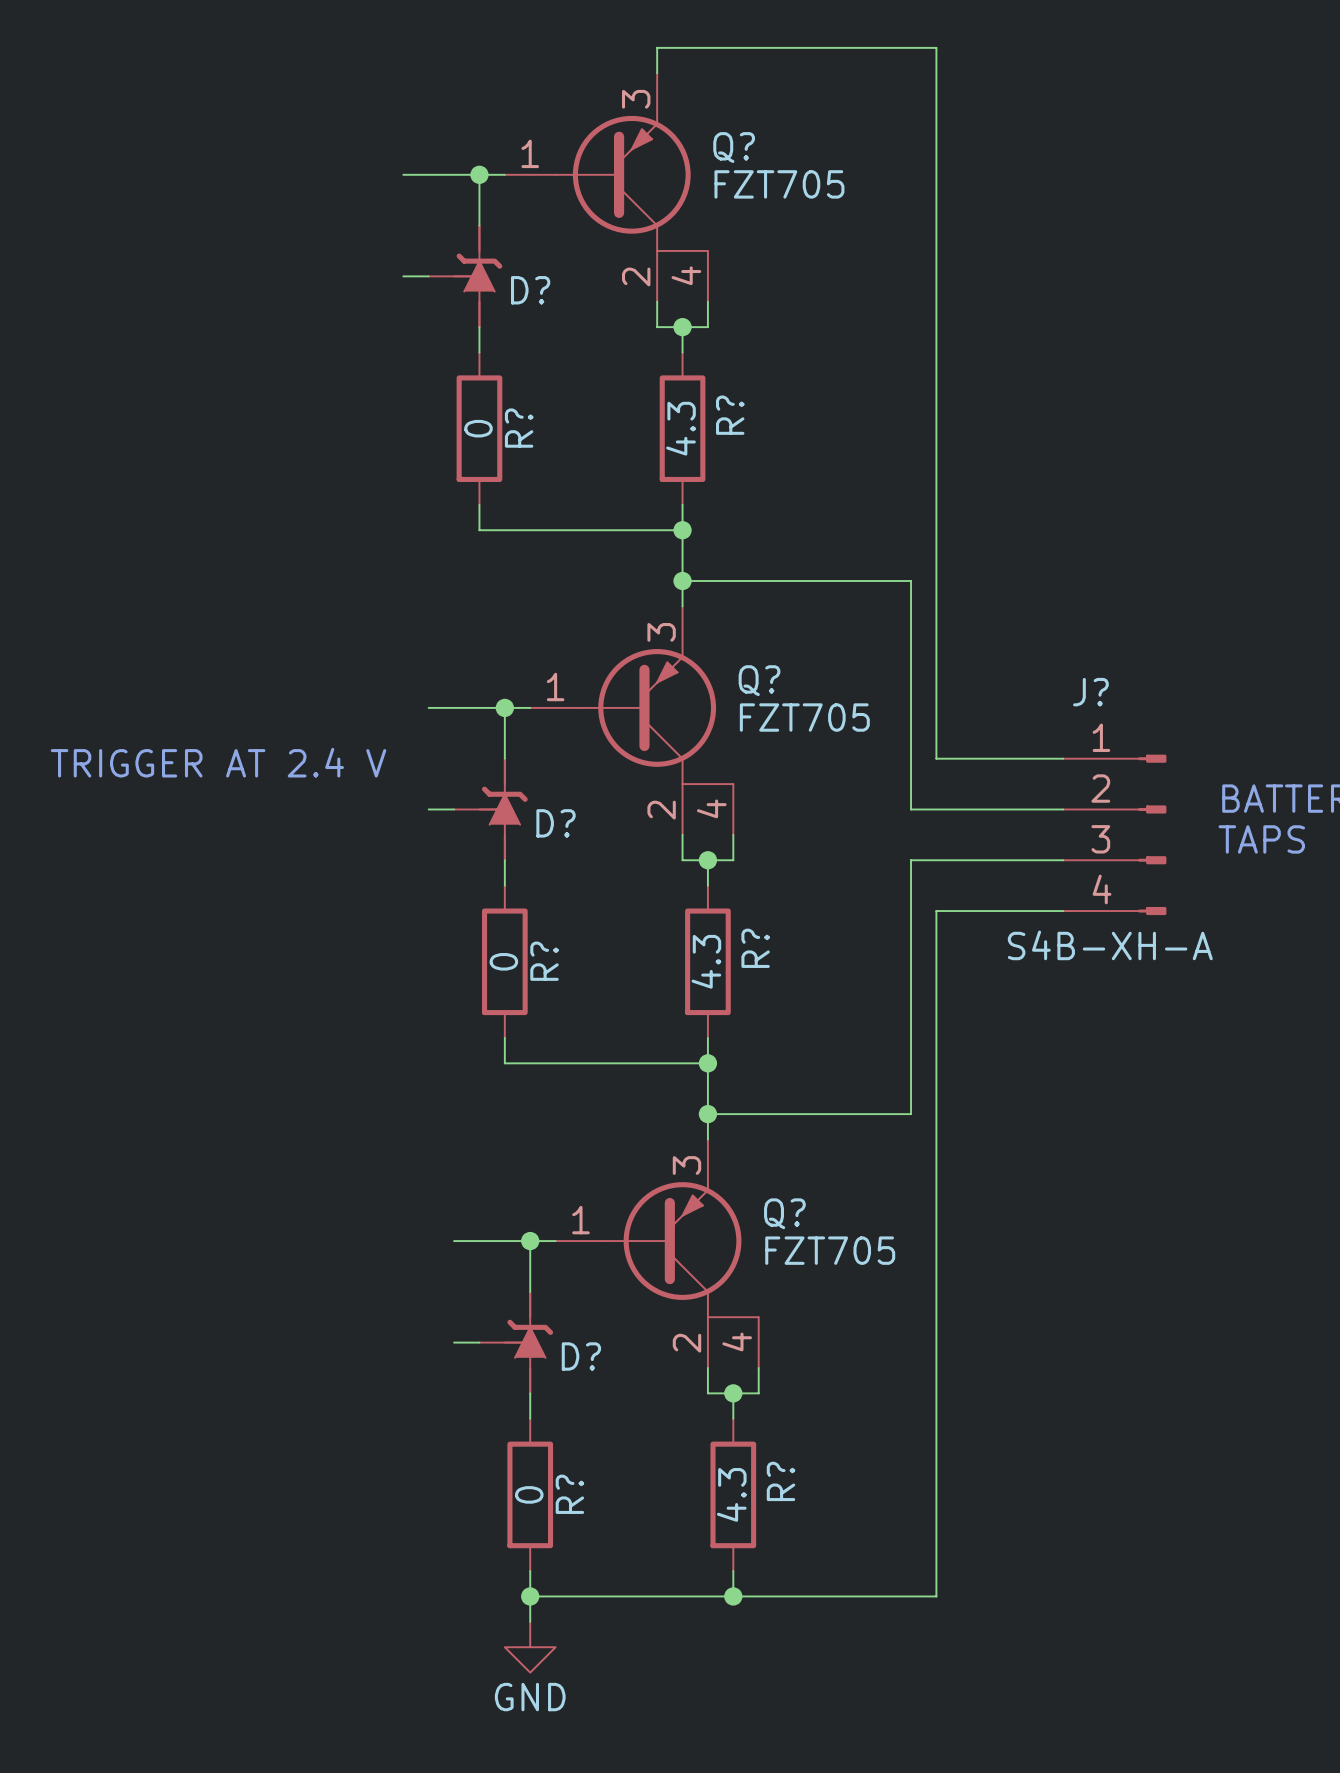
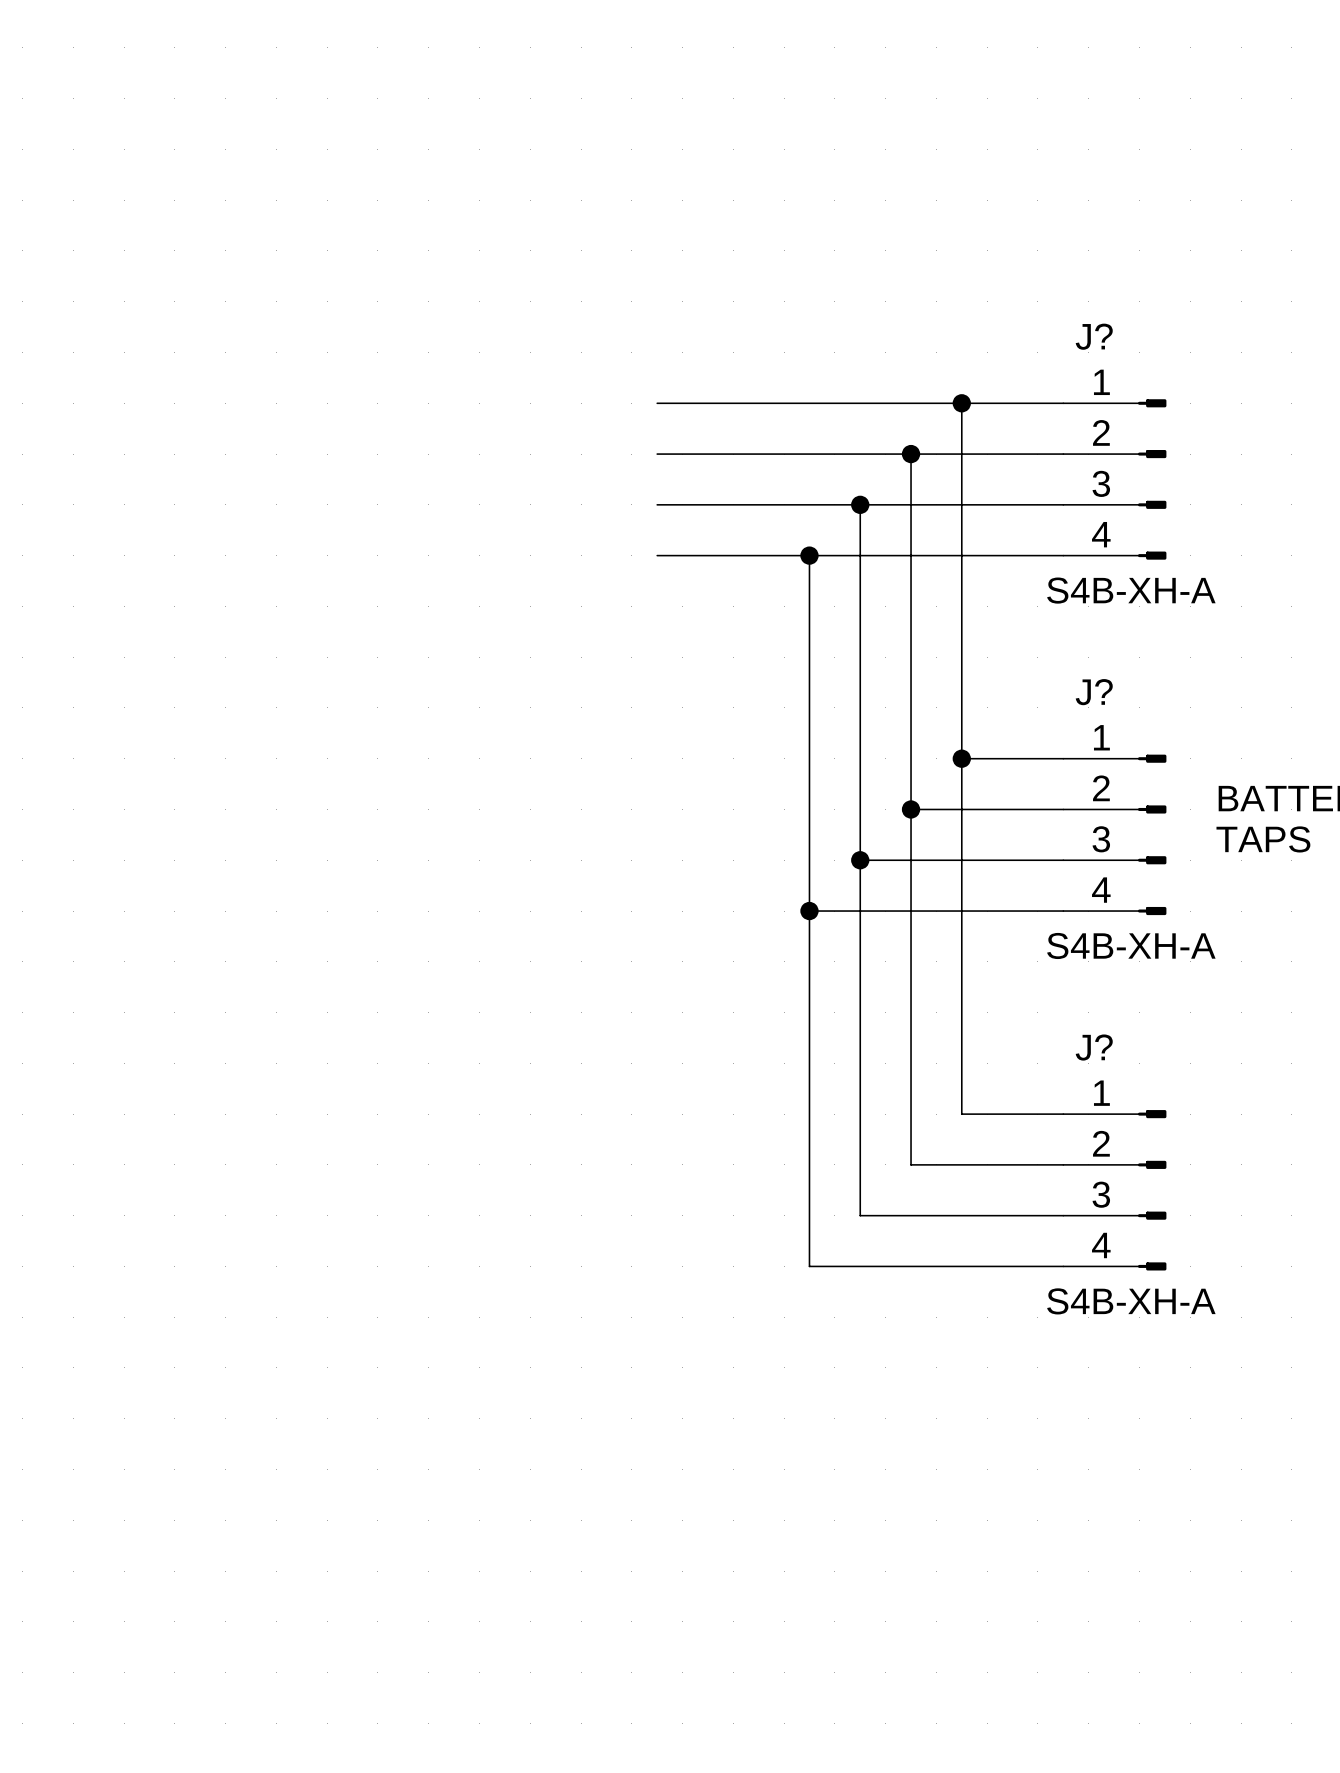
wire: (657, 73) (657, 47) (936, 47) (936, 758) (961, 758) -> none
wire: (403, 174) (504, 174) -> none
wire: (479, 174) (479, 225) -> none
junction: (479, 174) -> none
Q?: FZT705 (606, 187) -> none
wire: (403, 276) (428, 276) -> none
D?: (465, 276) -> none
wire: (657, 301) (657, 327) (707, 327) (707, 301) -> none
wire: (479, 327) (479, 352) -> none
wire: (682, 327) (682, 352) -> none
junction: (682, 327) -> none
wire: none -> (657, 403) (1063, 403)
wire: none -> (961, 403) (961, 1114) (1063, 1114)
junction: none -> (961, 403)
R?: (479, 428) -> none
R?: (682, 428) -> none
wire: none -> (657, 454) (1063, 454)
junction: none -> (911, 454)
J?: none -> S4B-XH-A (1114, 479)
wire: (479, 504) (479, 530) (682, 530) -> none
wire: none -> (657, 504) (1063, 504)
wire: (682, 504) (682, 606) -> none
wire: none -> (860, 504) (860, 1215) (1063, 1215)
junction: none -> (860, 504)
junction: (682, 530) -> none
wire: none -> (657, 555) (1063, 555)
wire: none -> (809, 555) (809, 1266) (1063, 1266)
junction: none -> (809, 555)
wire: (682, 581) (911, 581) -> (911, 454) (911, 581)
junction: (682, 581) -> none
wire: (428, 707) (530, 707) -> none
wire: (504, 707) (504, 758) -> none
junction: (504, 707) -> none
Q?: FZT705 (631, 720) -> none
junction: none -> (961, 758)
text: TRIGGER AT 2.4 V (218, 762) -> none
wire: (428, 809) (454, 809) -> none
D?: (490, 809) -> none
wire: none -> (911, 809) (911, 860) (860, 860)
junction: none -> (911, 809)
wire: (682, 834) (682, 860) (733, 860) (733, 834) -> none
wire: (504, 860) (504, 885) -> none
wire: (707, 860) (707, 885) -> none
junction: (707, 860) -> none
junction: none -> (860, 860)
junction: none -> (809, 911)
wire: (936, 911) (936, 1596) (530, 1596) -> (936, 911) (809, 911)
R?: (504, 961) -> none
R?: (707, 961) -> none
wire: (504, 1037) (504, 1063) (707, 1063) -> none
wire: (707, 1037) (707, 1139) -> none
junction: (707, 1063) -> none
wire: (707, 1114) (911, 1114) -> (1063, 1164) (911, 1164) (911, 1114)
junction: (707, 1114) -> none
J?: none -> S4B-XH-A (1114, 1190)
wire: (454, 1241) (555, 1241) -> none
wire: (530, 1241) (530, 1291) -> none
junction: (530, 1241) -> none
Q?: FZT705 (657, 1253) -> none
wire: (454, 1342) (479, 1342) -> none
D?: (516, 1342) -> none
wire: (707, 1367) (707, 1393) (758, 1393) (758, 1367) -> none
wire: (530, 1393) (530, 1418) -> none
wire: (733, 1393) (733, 1418) -> none
junction: (733, 1393) -> none
R?: (530, 1494) -> none
R?: (733, 1494) -> none
wire: (530, 1571) (530, 1621) -> none
wire: (733, 1571) (733, 1596) -> none
junction: (530, 1596) -> none
junction: (733, 1596) -> none
power symbol: GND (530, 1647) -> none

